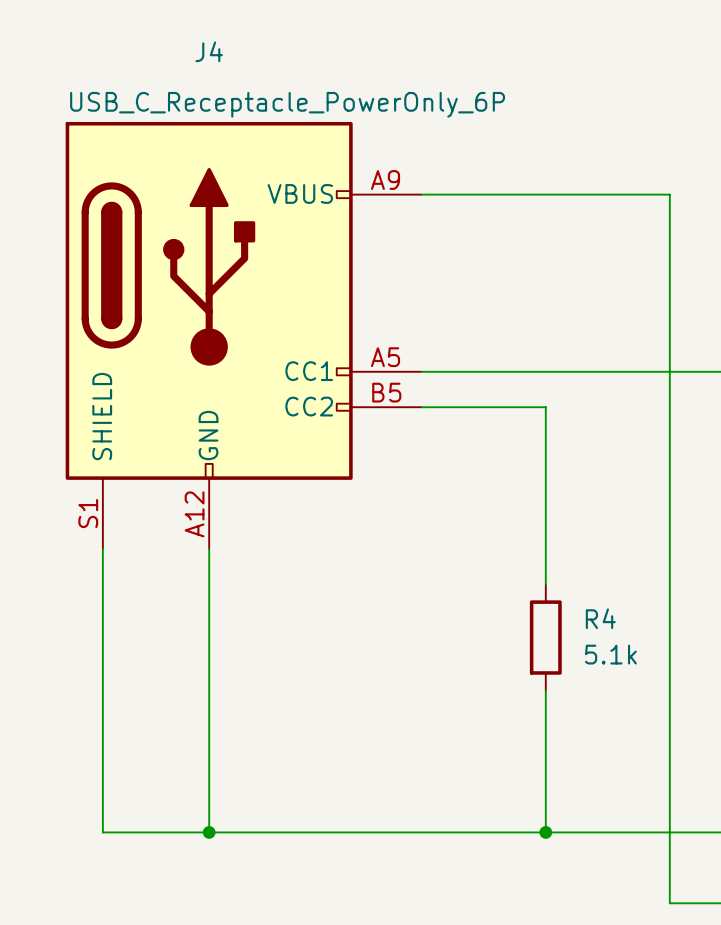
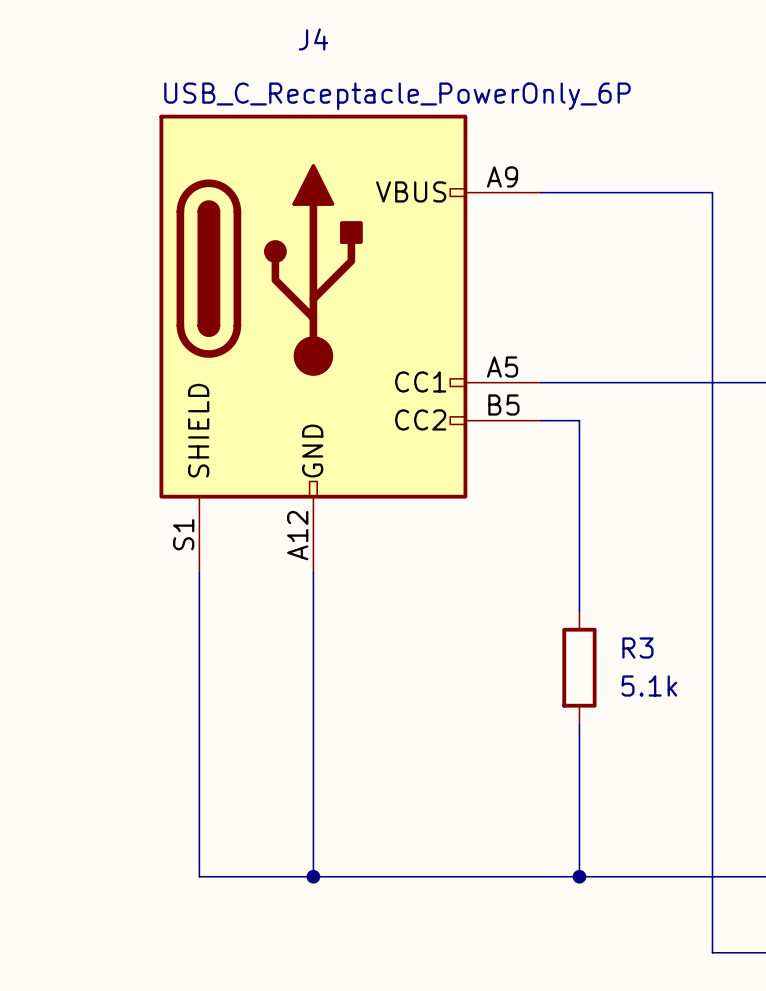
J4 position: (243, 335) -> (350, 343)
wire: (102, 548) (102, 832) (191, 832) -> (199, 572) (199, 876)
wire: (209, 548) (209, 832) -> (313, 572) (313, 876)
R4 name: R4 (600, 618) -> R3 (637, 648)
junction: (209, 832) -> none
junction: none -> (313, 876)

